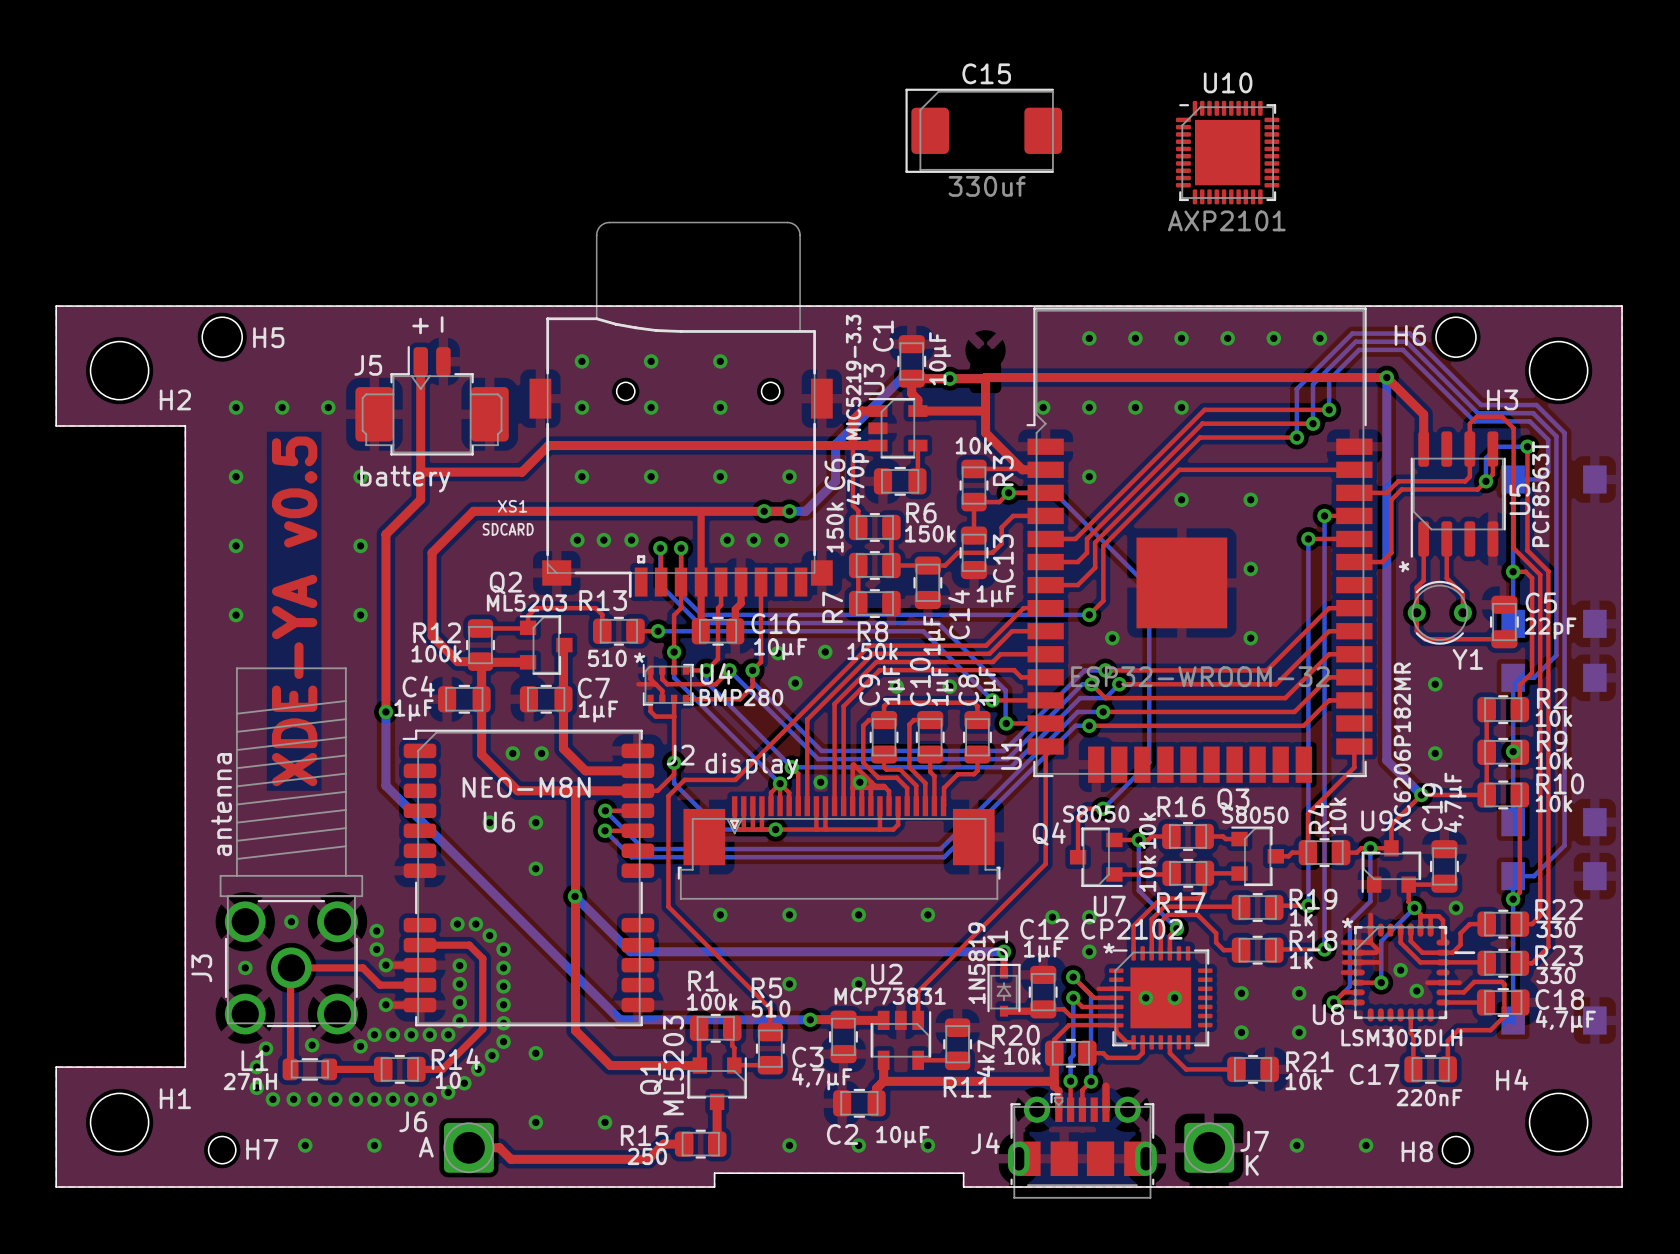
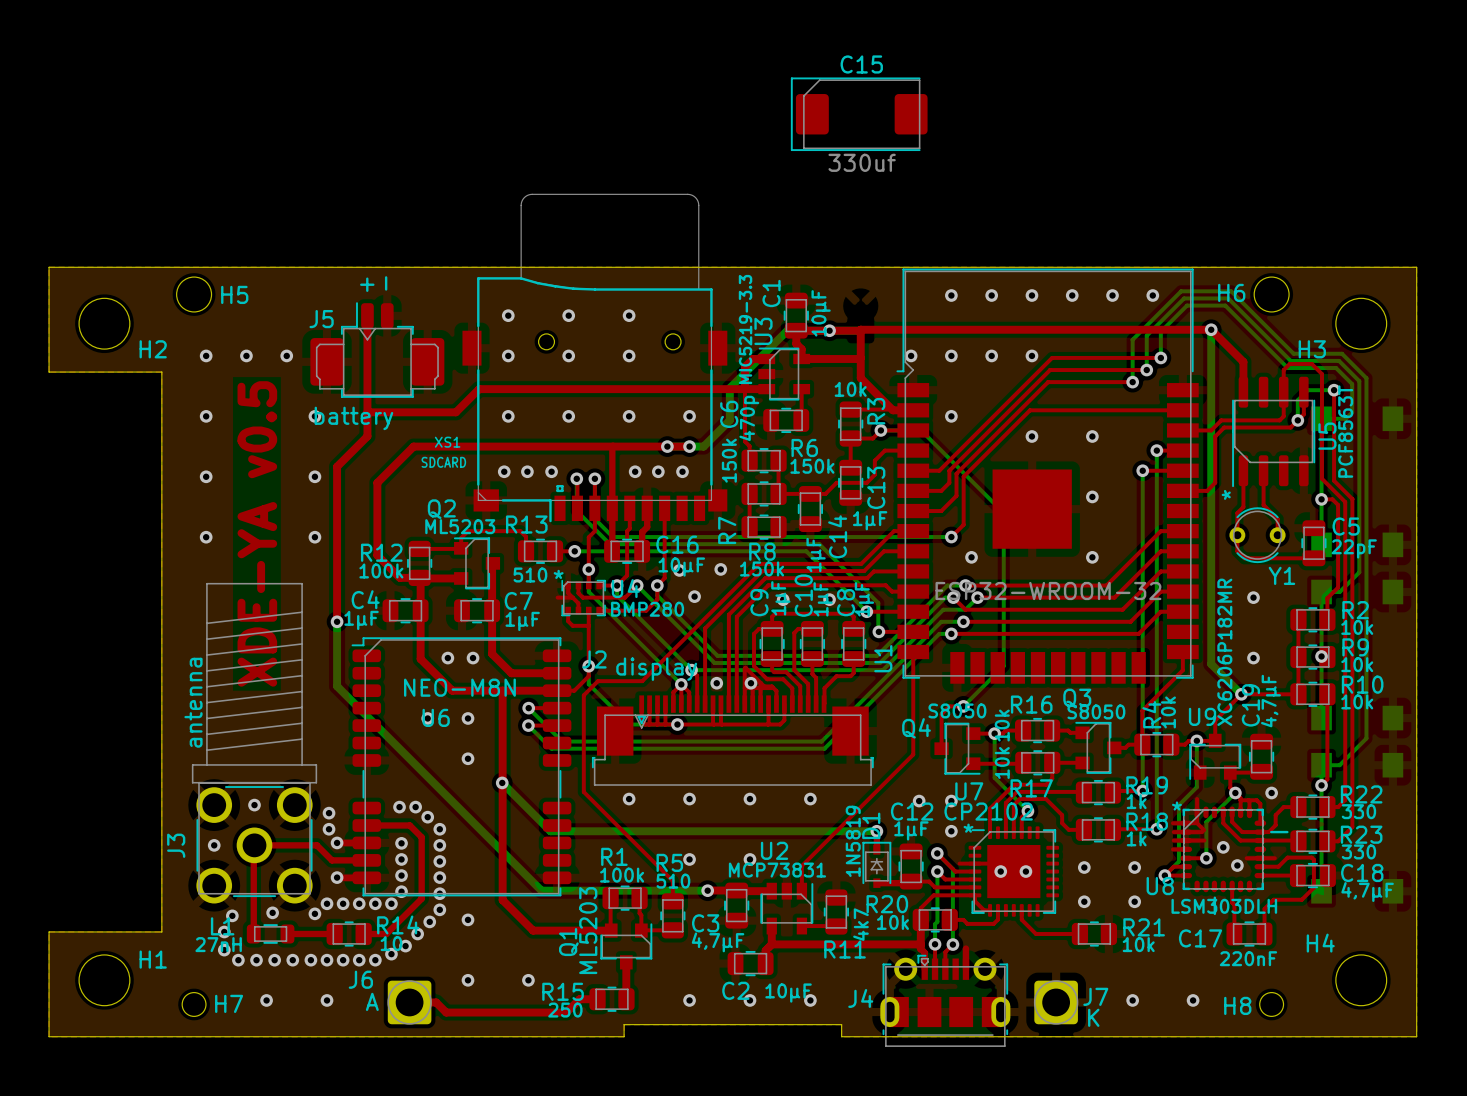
U10: AXP2101 (1227, 152) -> none

